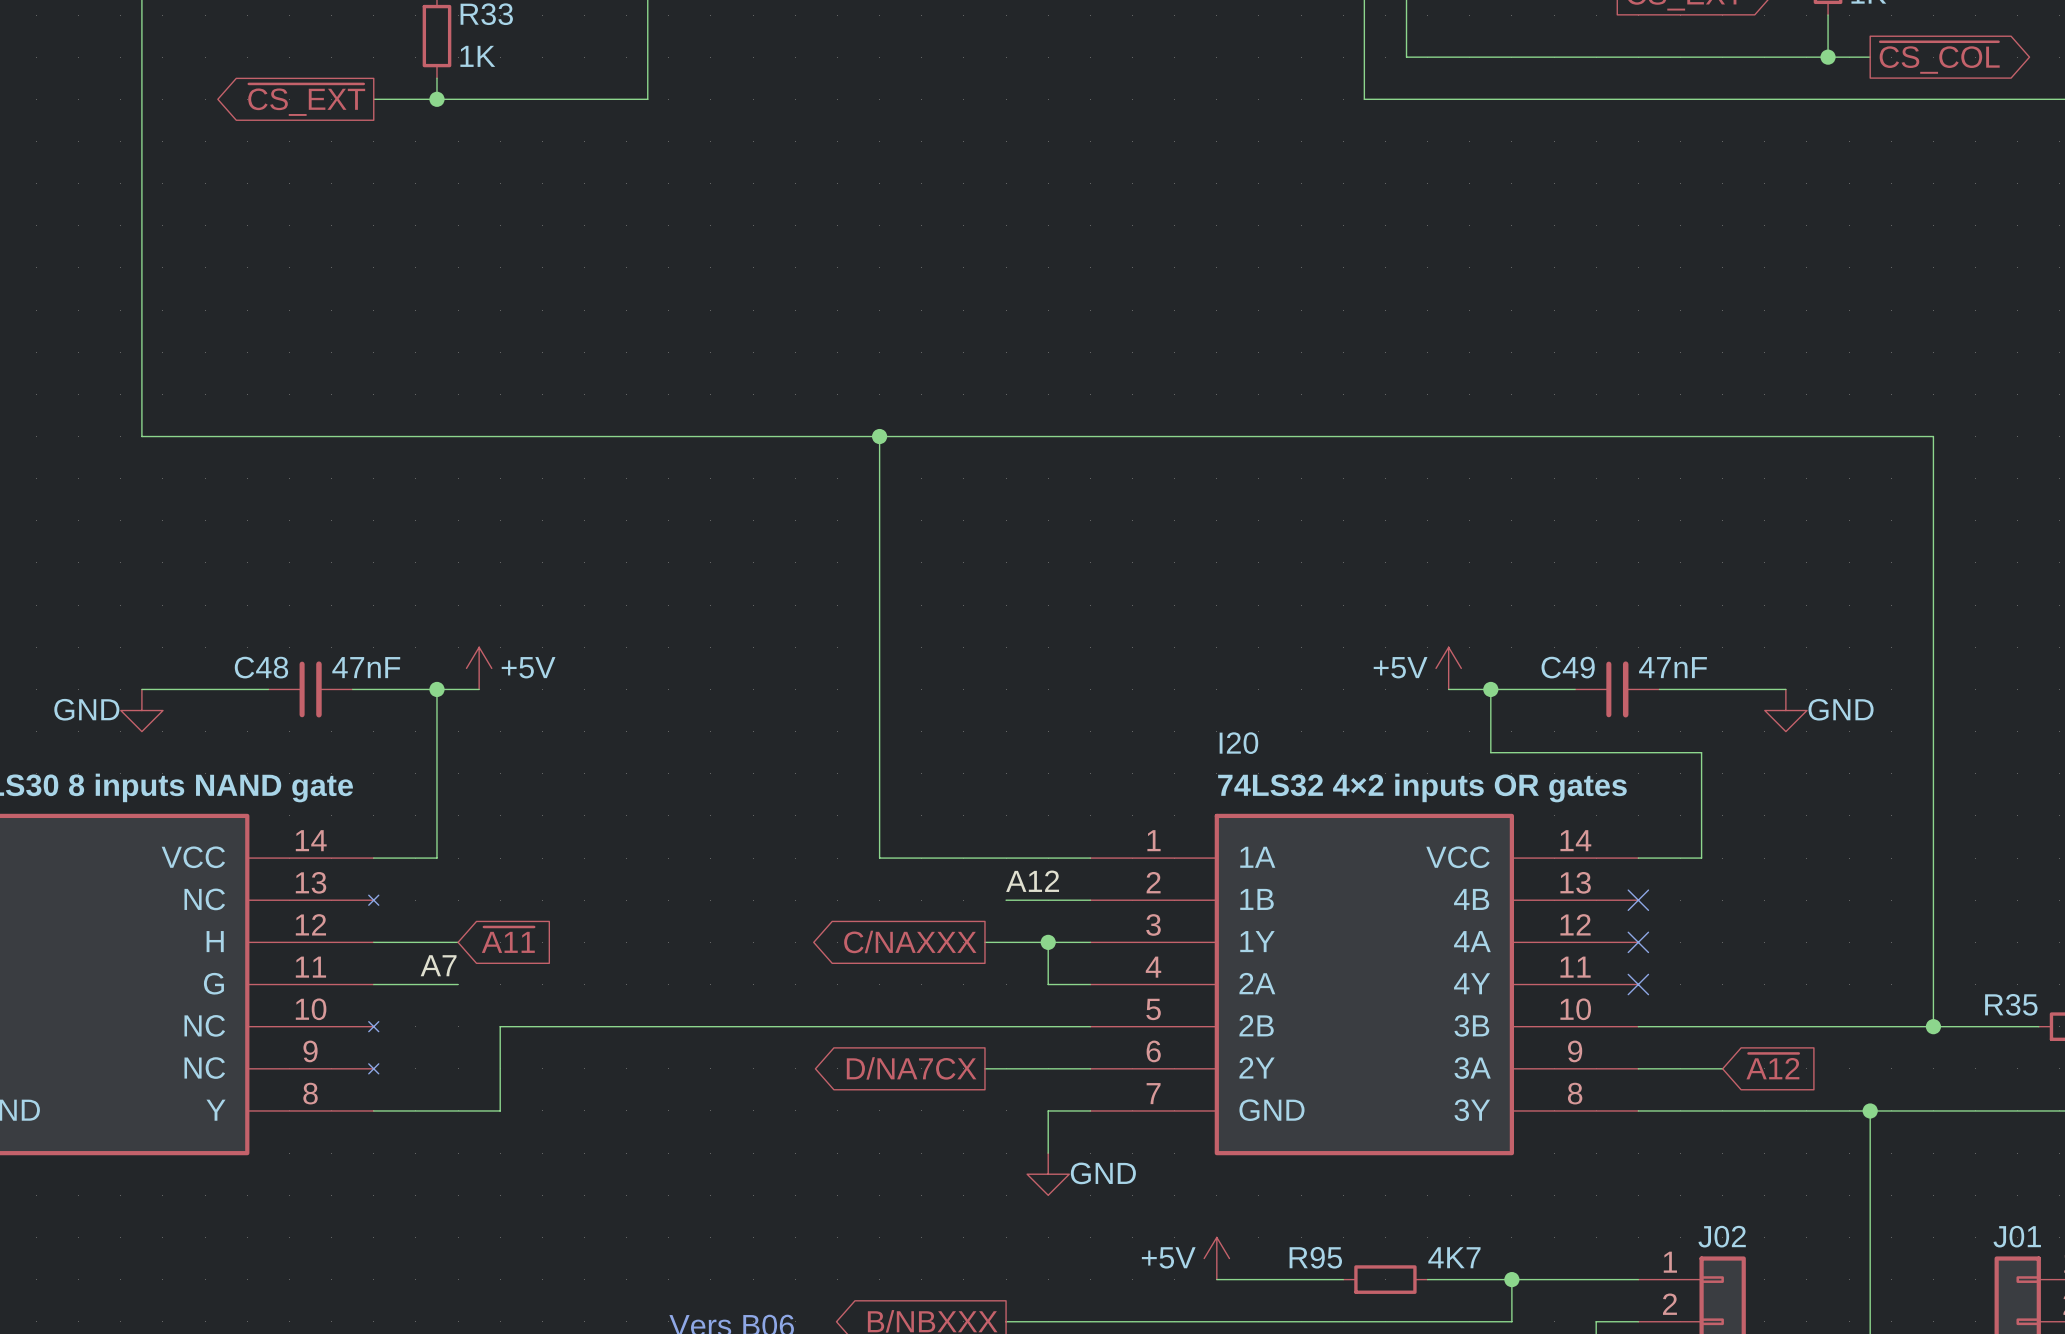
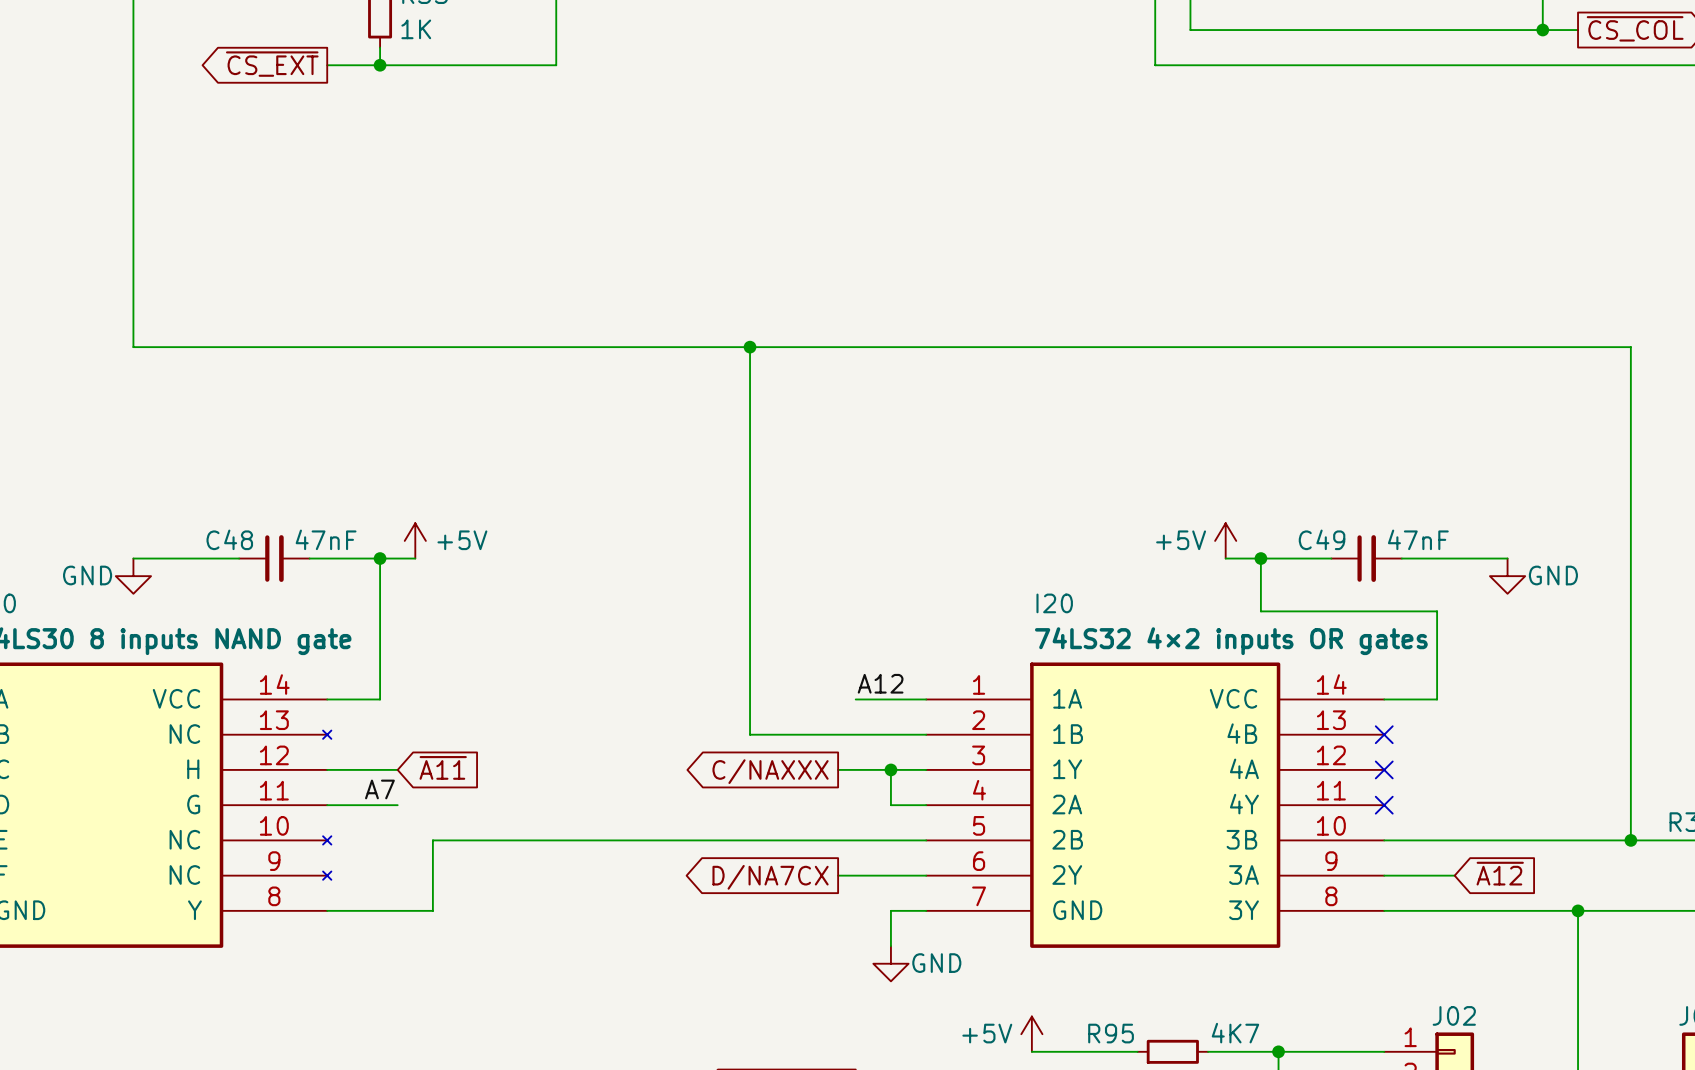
wire: (879, 858) (1006, 858) -> (750, 699) (750, 734) (855, 734)
label position: A12 (1032, 881) -> A12 (880, 683)

